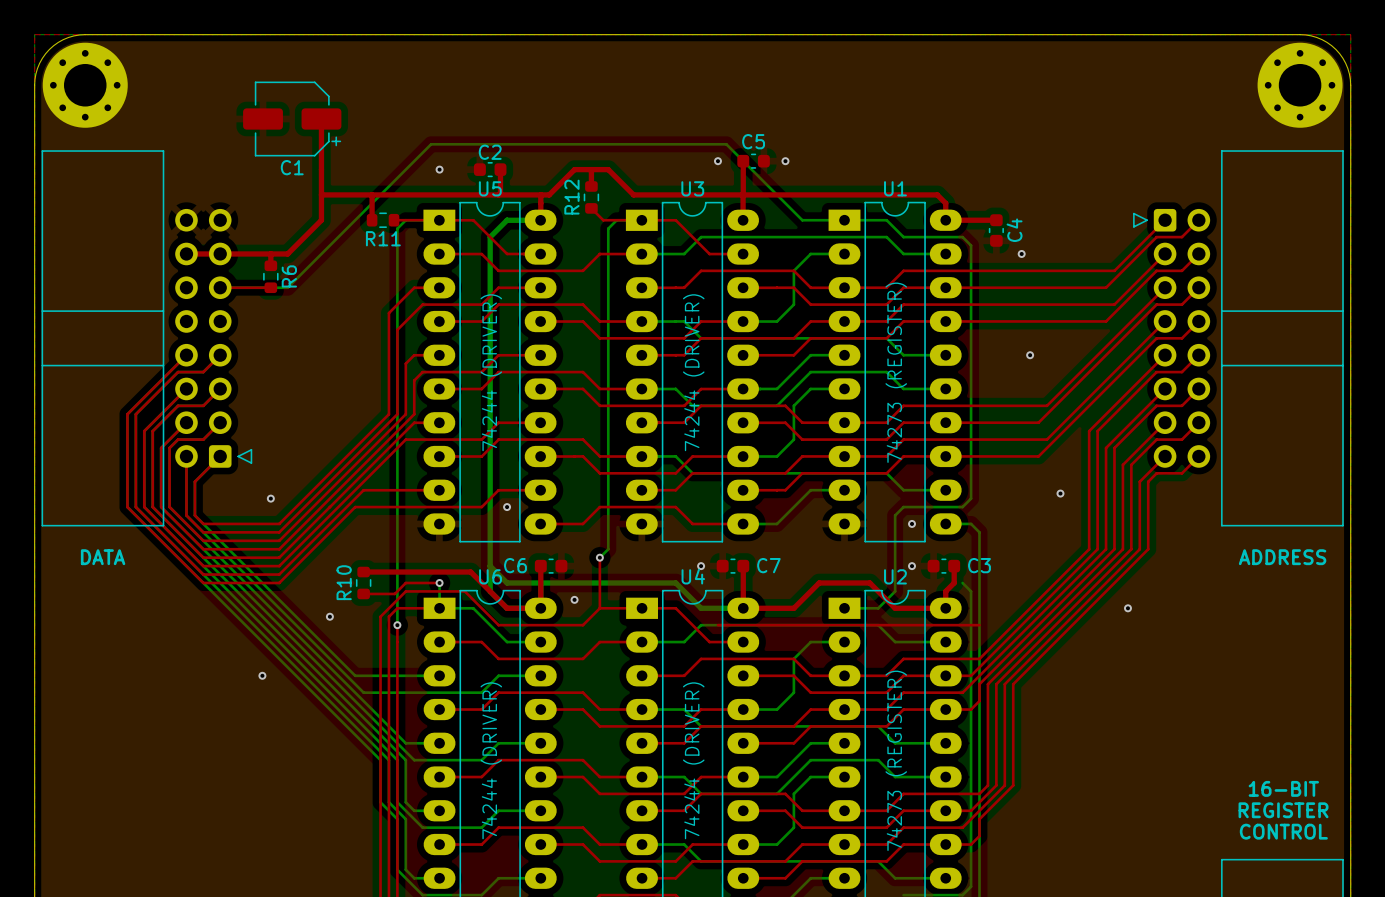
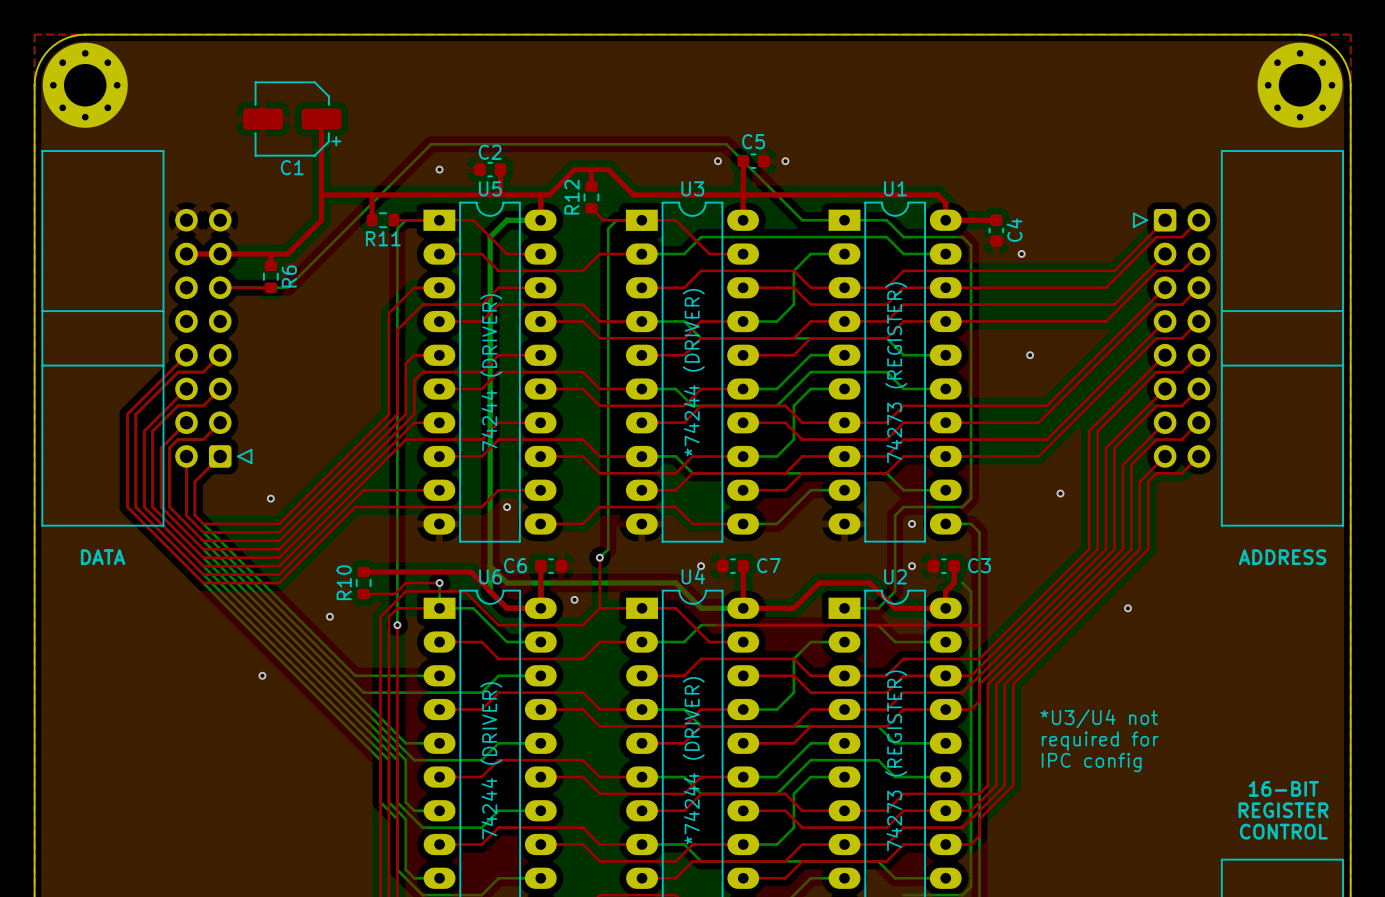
text: 74244 (DRIVER) (693, 372) -> *74244 (DRIVER) (693, 372)
text: none -> *U3/U4 not (1099, 718)
text: none -> required for (1100, 741)
text: 74244 (DRIVER) (693, 760) -> *74244 (DRIVER) (693, 760)
text: none -> IPC config (1091, 762)

